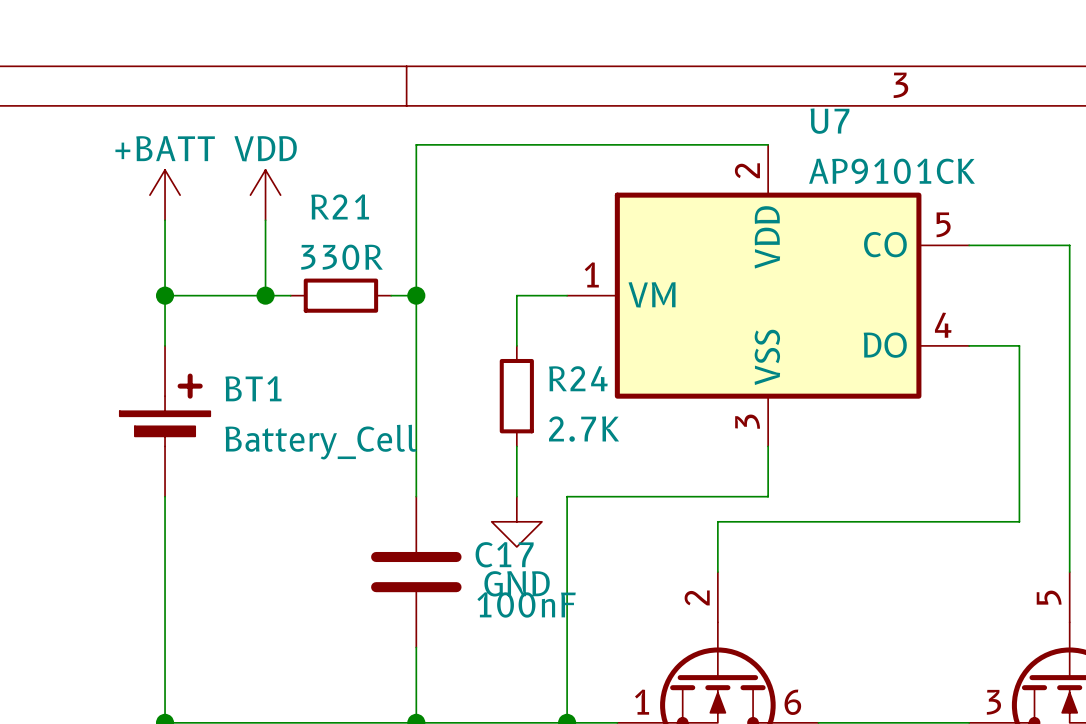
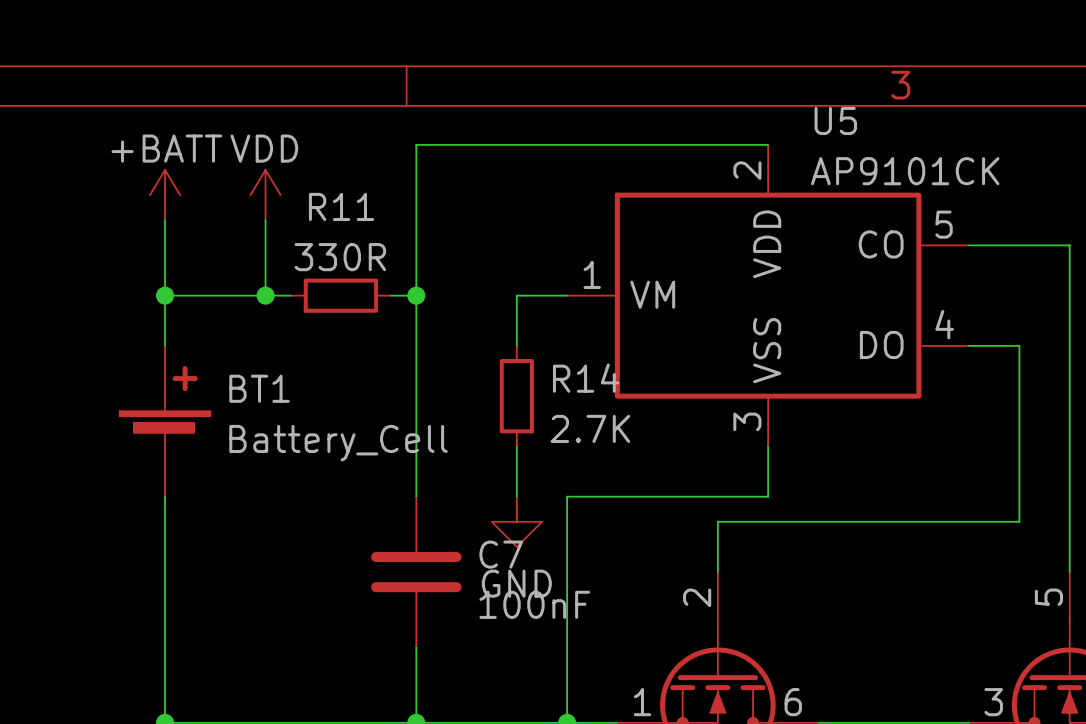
U7 name: U7 (829, 121) -> U5 (835, 120)
R21 name: R21 (340, 206) -> R11 (341, 206)
BT1 symbol: [119, 345, 211, 497] -> [119, 345, 211, 497]
R24 name: R24 (578, 378) -> R14 (586, 378)
C17 name: C17 (504, 554) -> C7 (501, 554)

